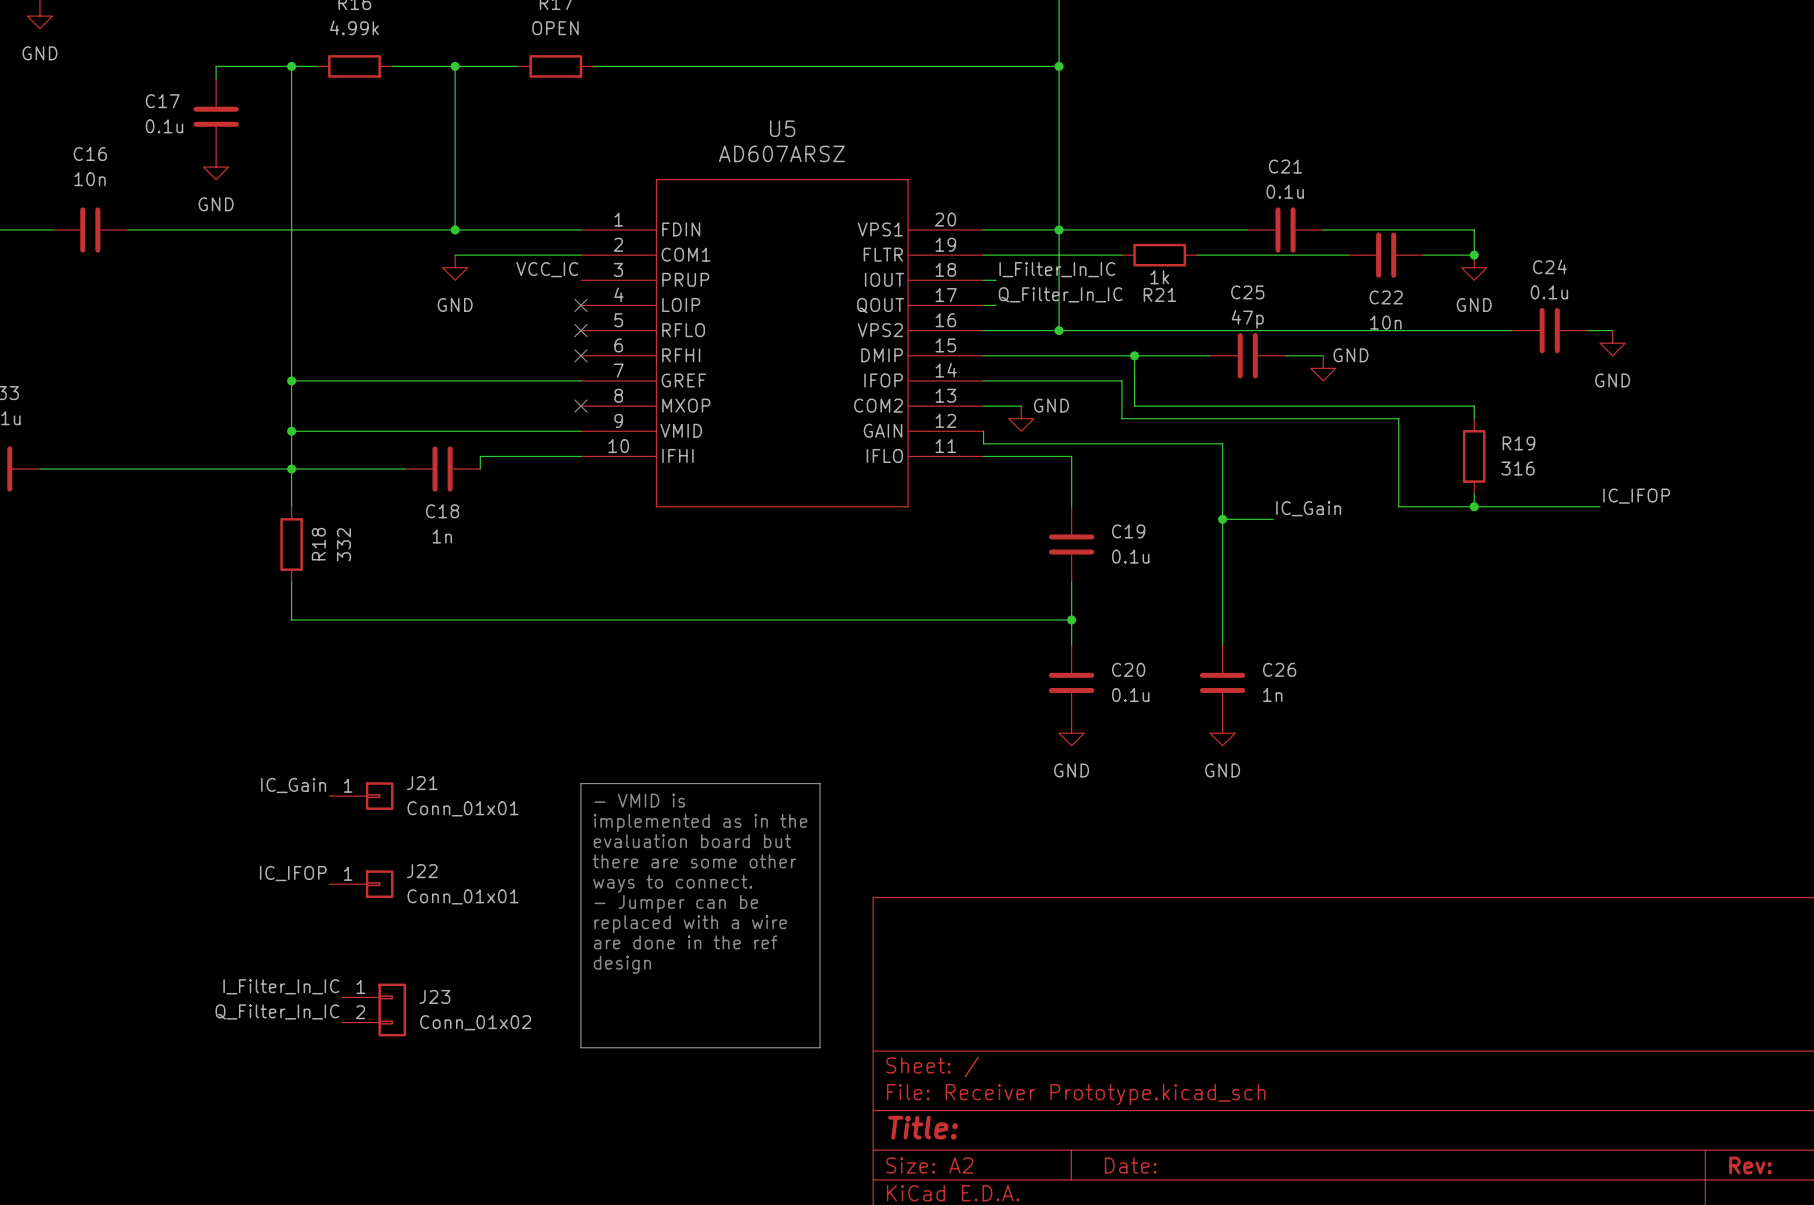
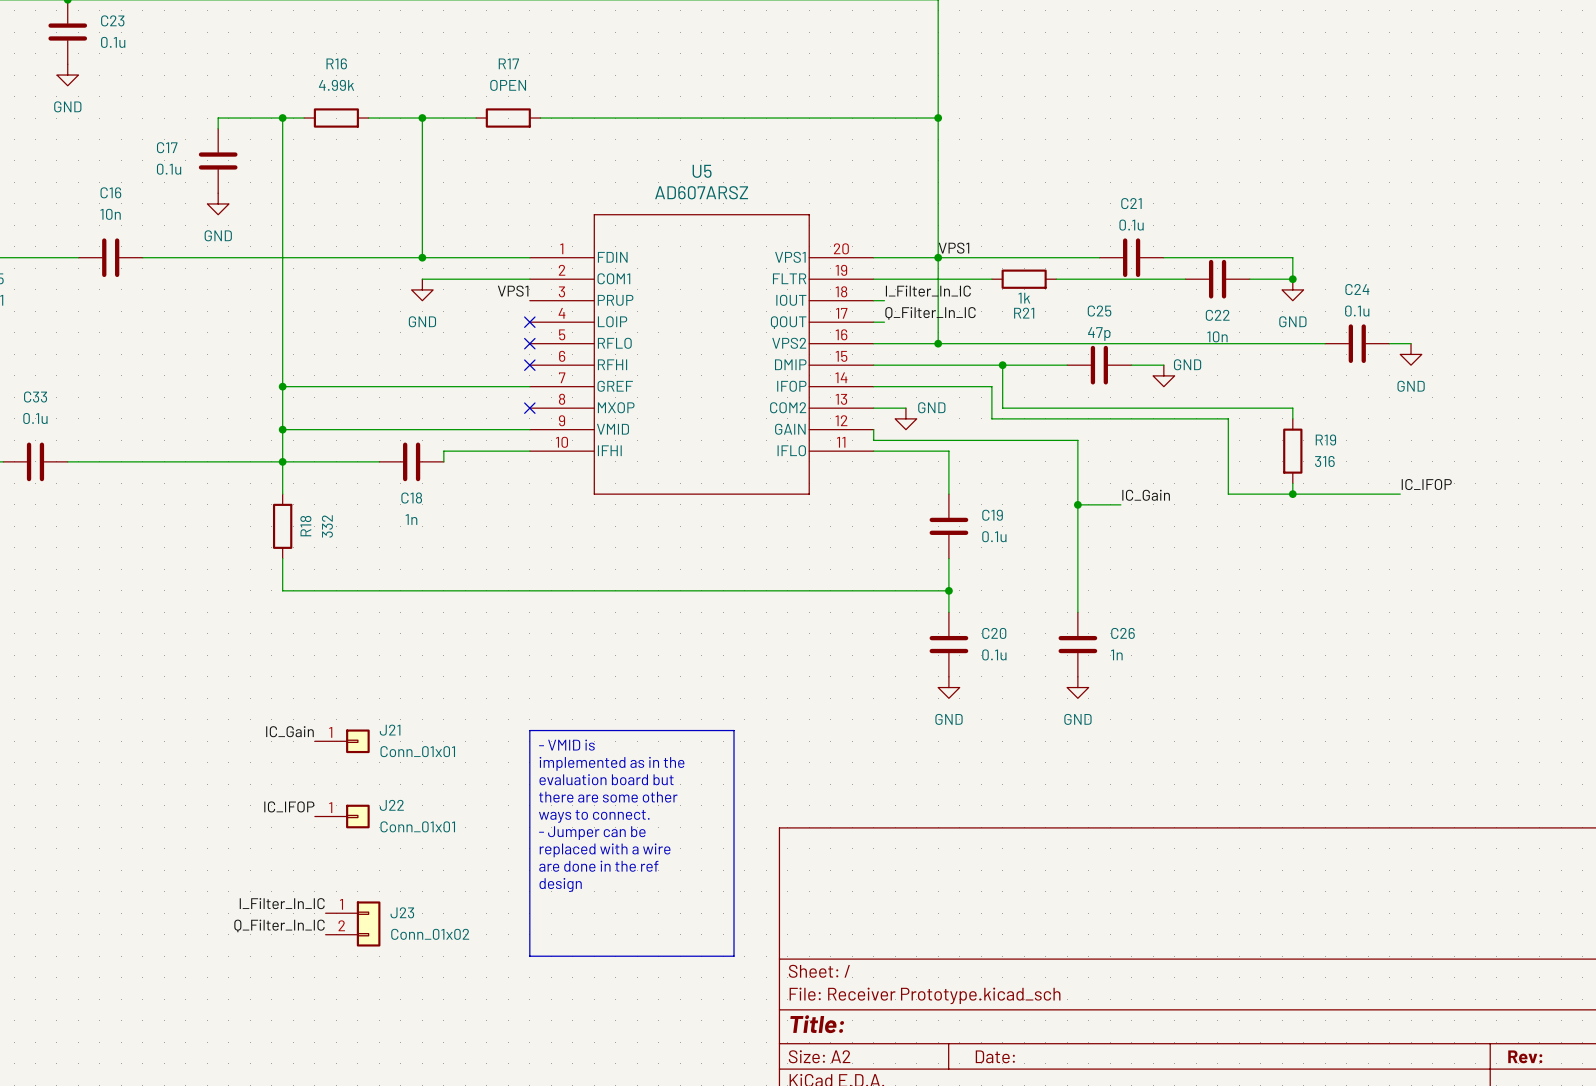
label: none -> VPS1 (953, 248)
label: VCC_IC (547, 269) -> VPS1 (513, 291)

